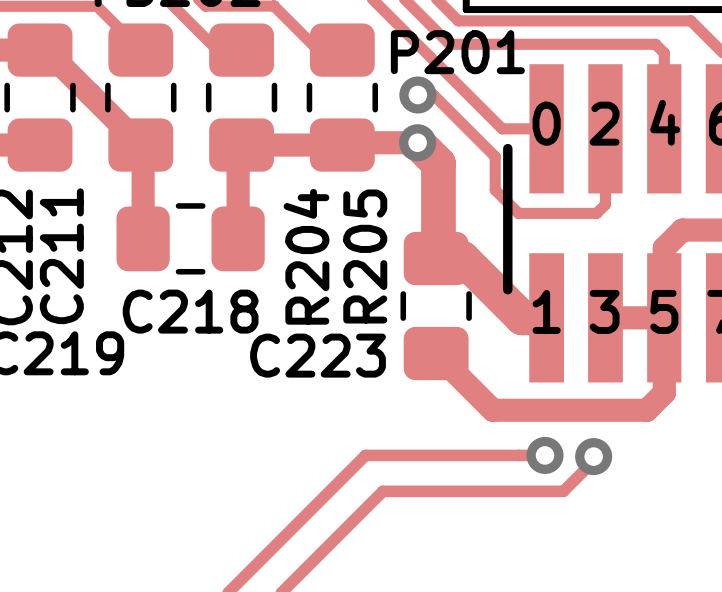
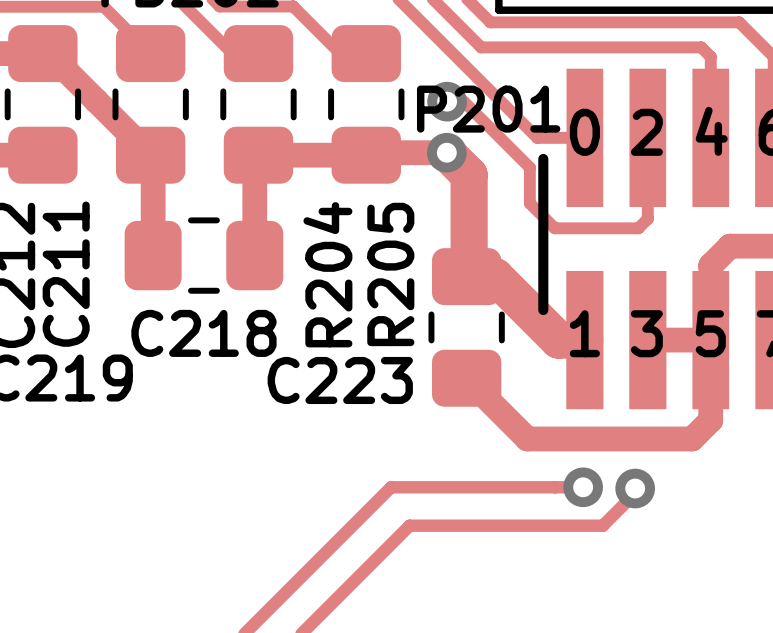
P201 name position: P201 (457, 52) -> P201 (488, 109)

